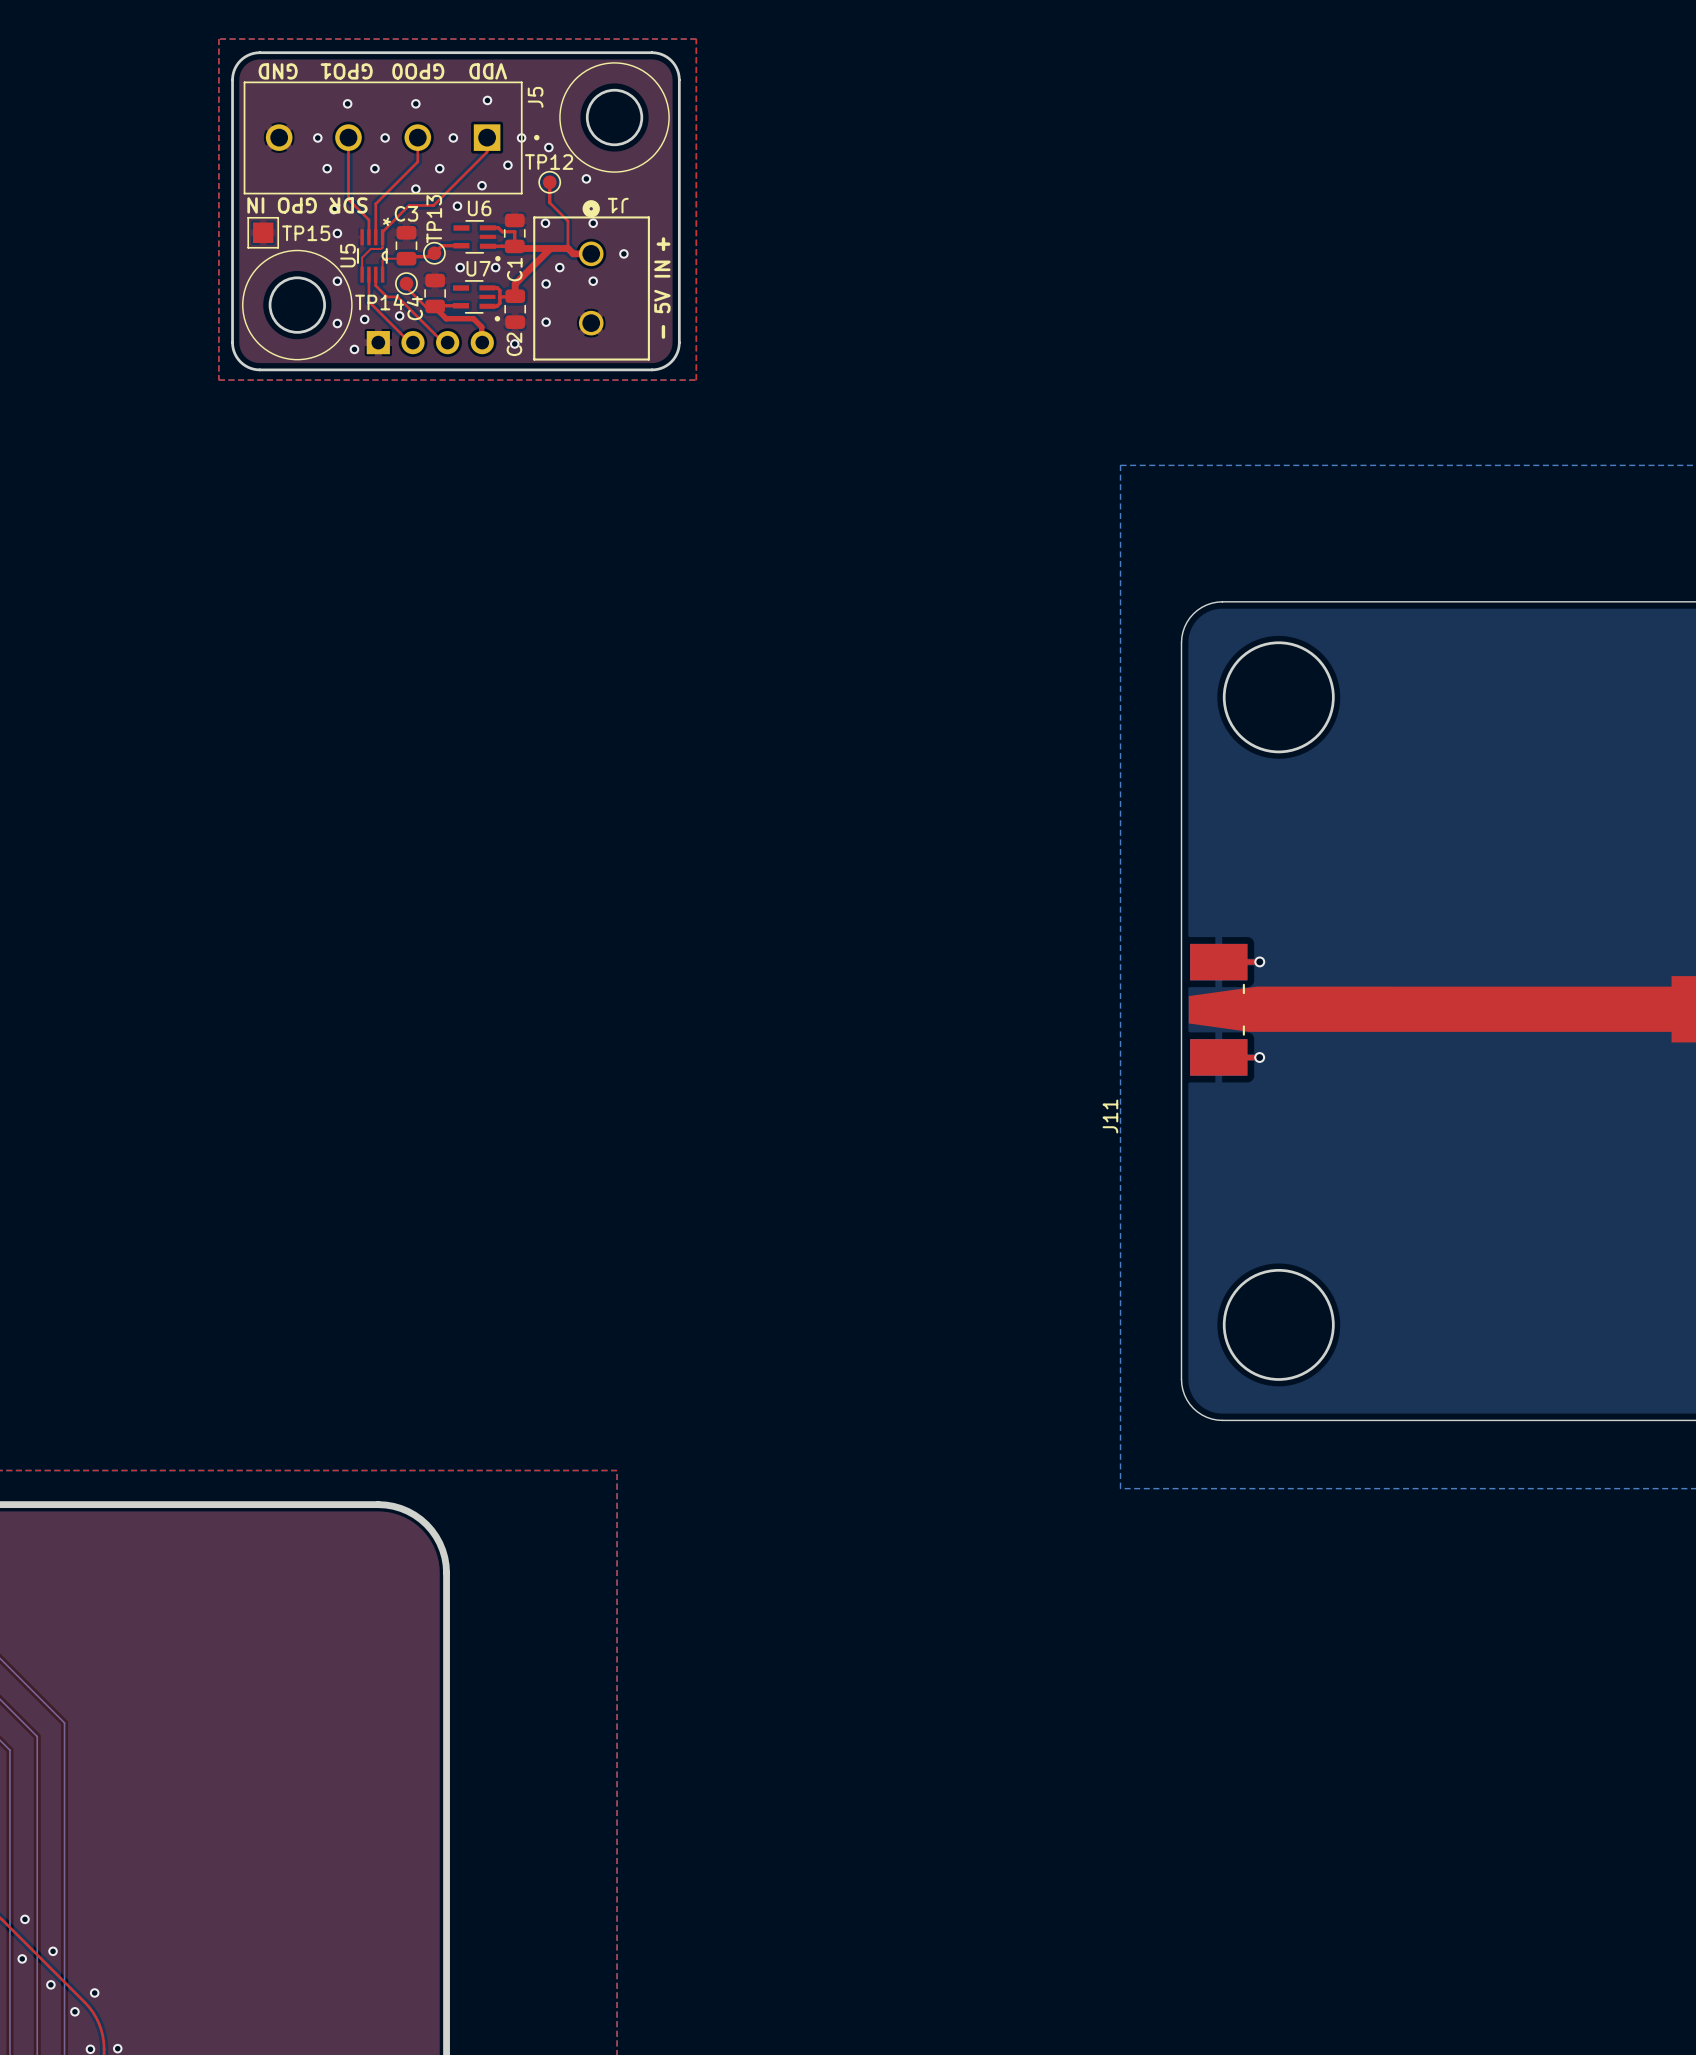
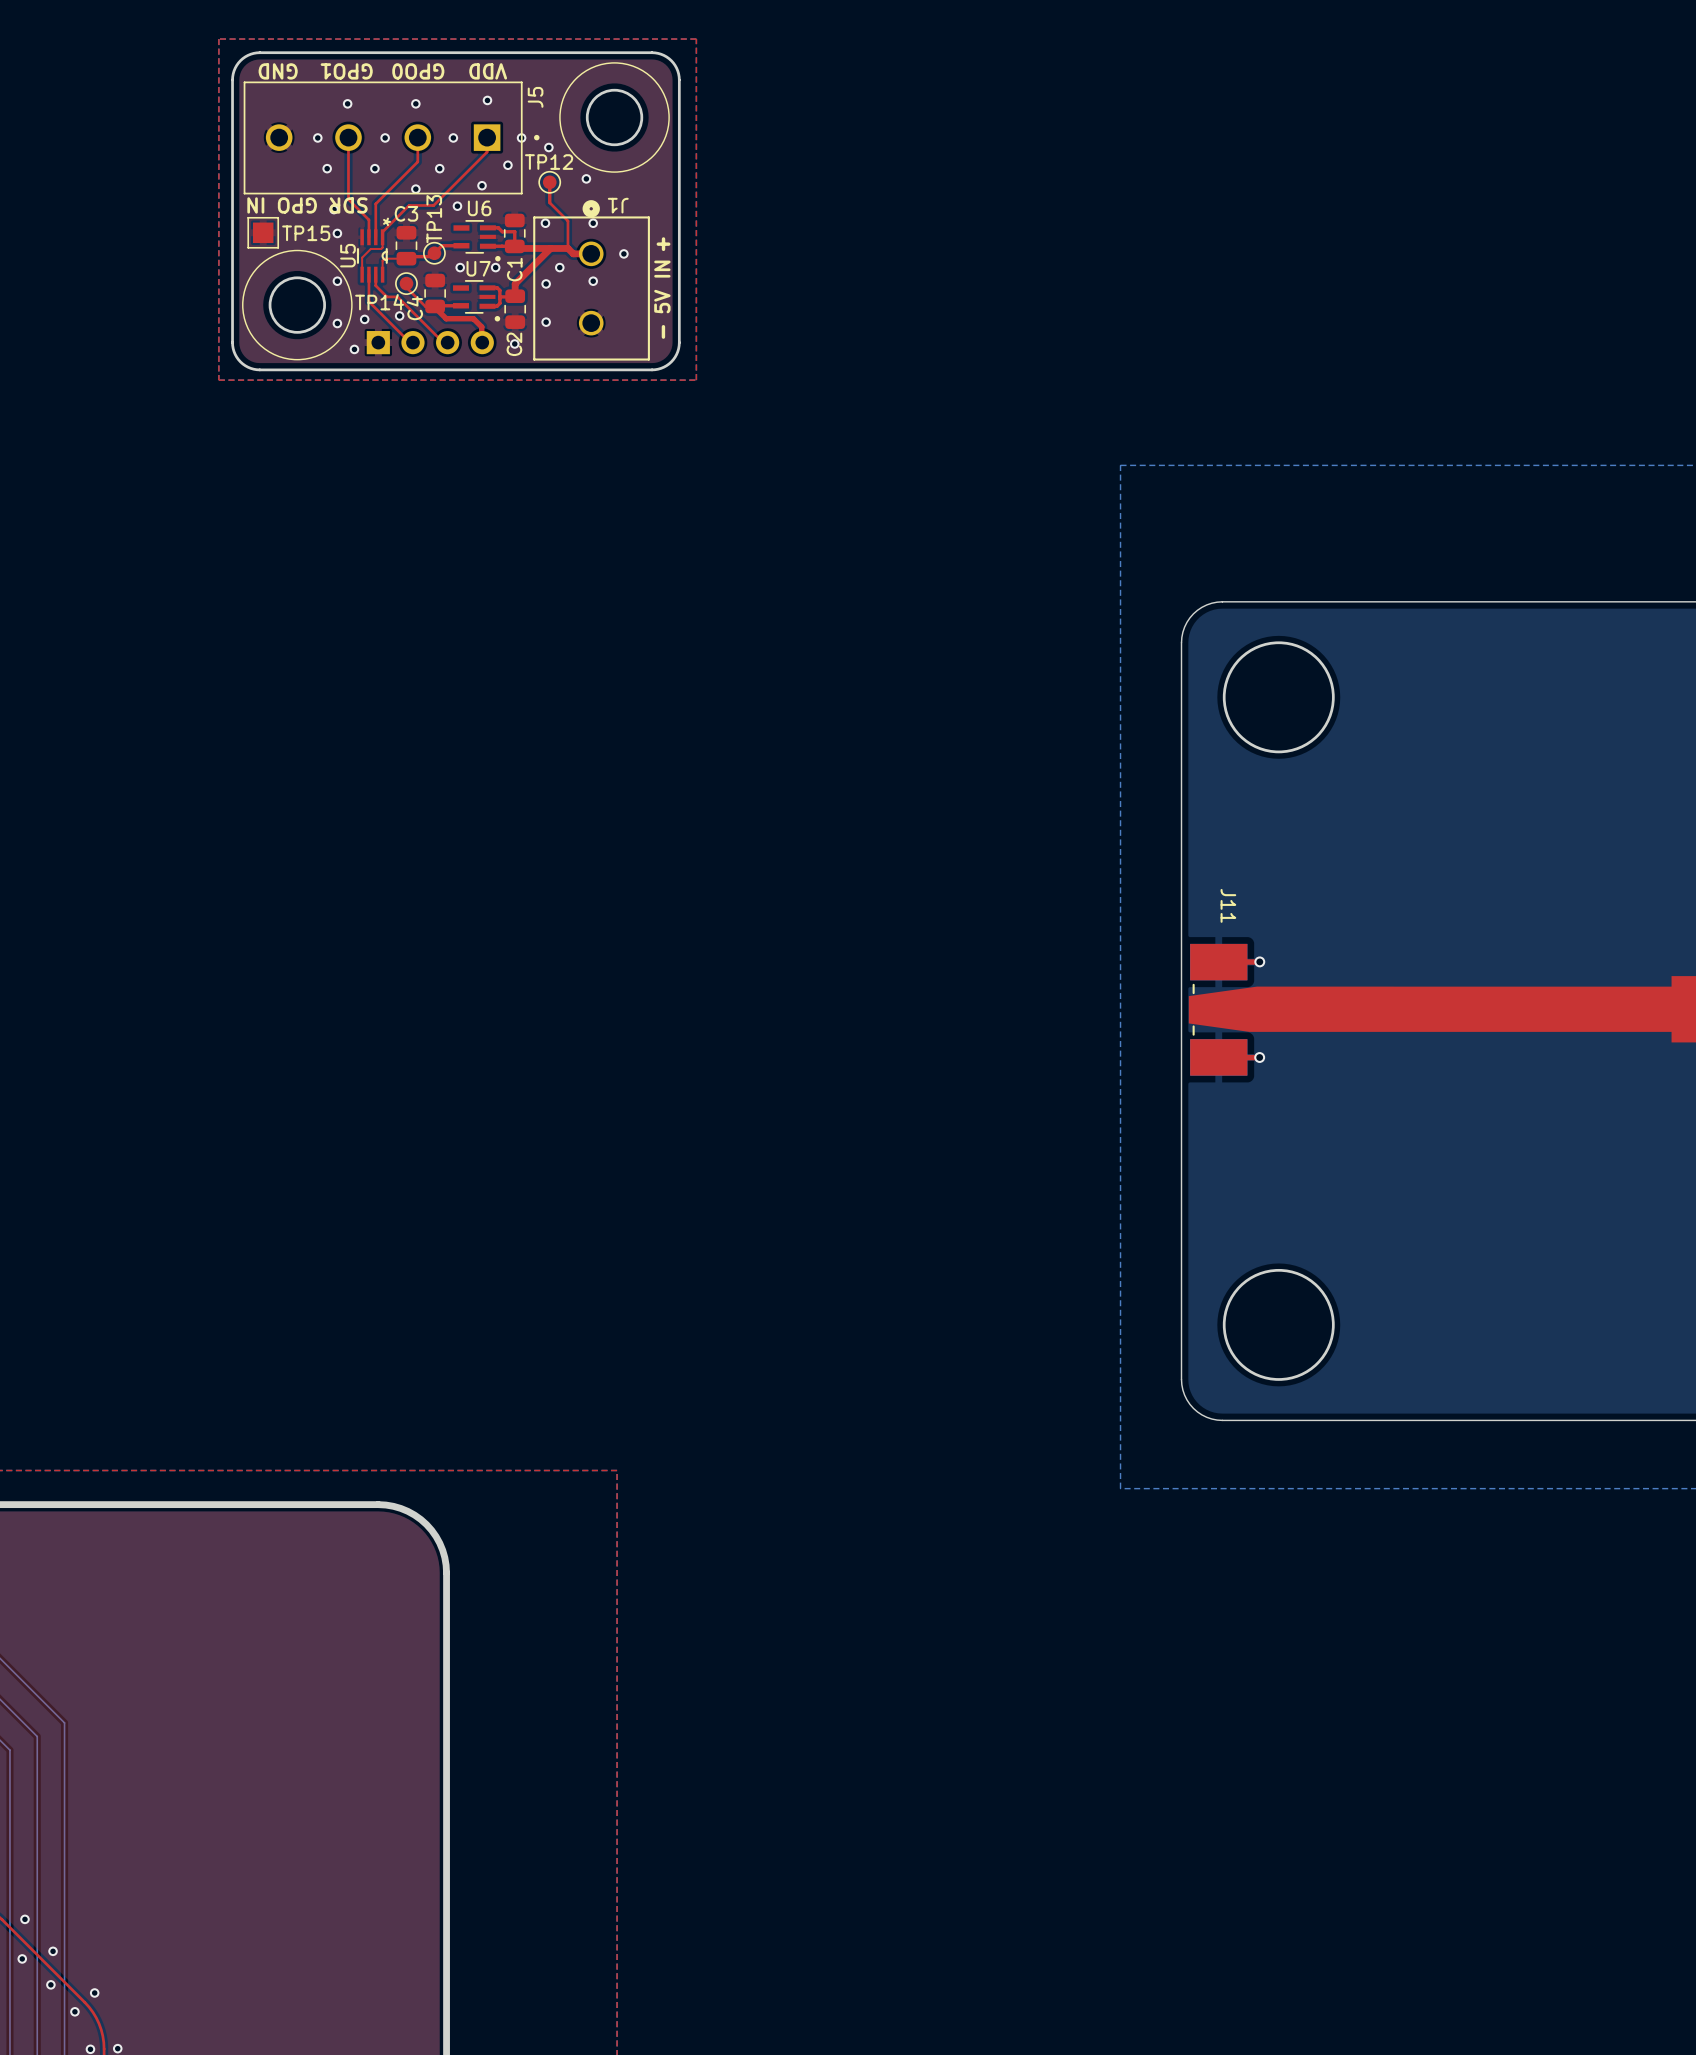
J11 rotation: 0° (1218, 1009) -> 180° (1218, 1009)
J11 name position: J11 (1110, 1116) -> J11 (1228, 905)

